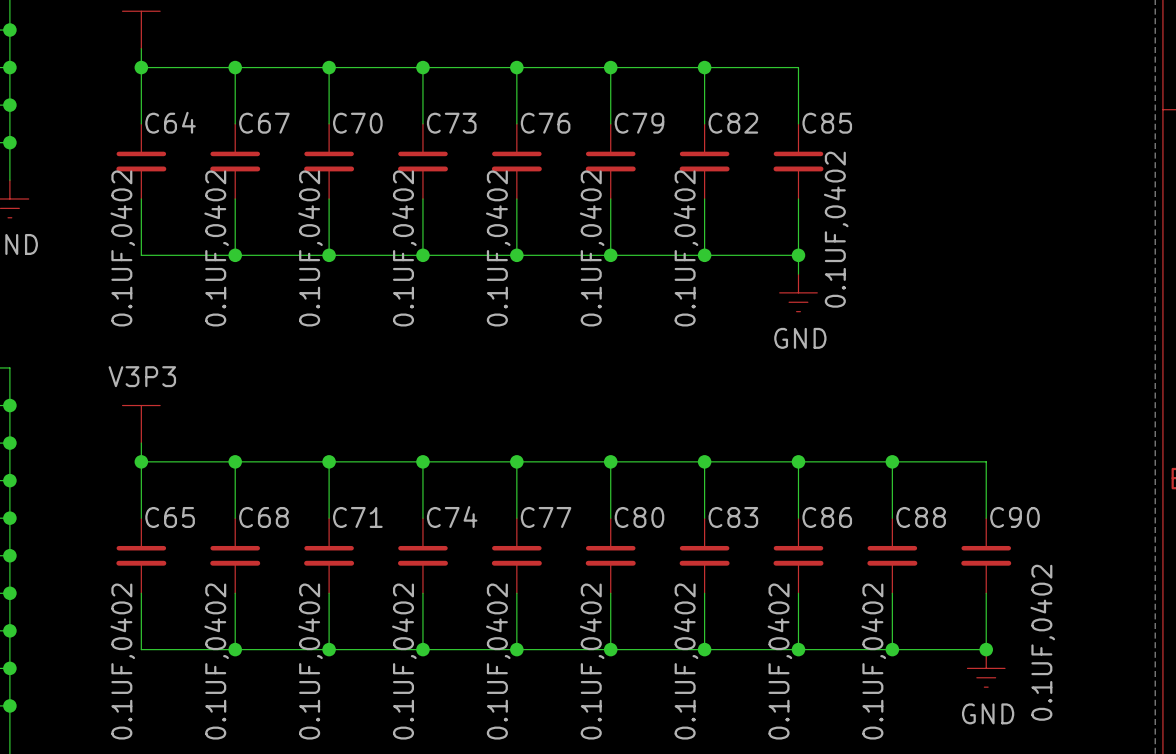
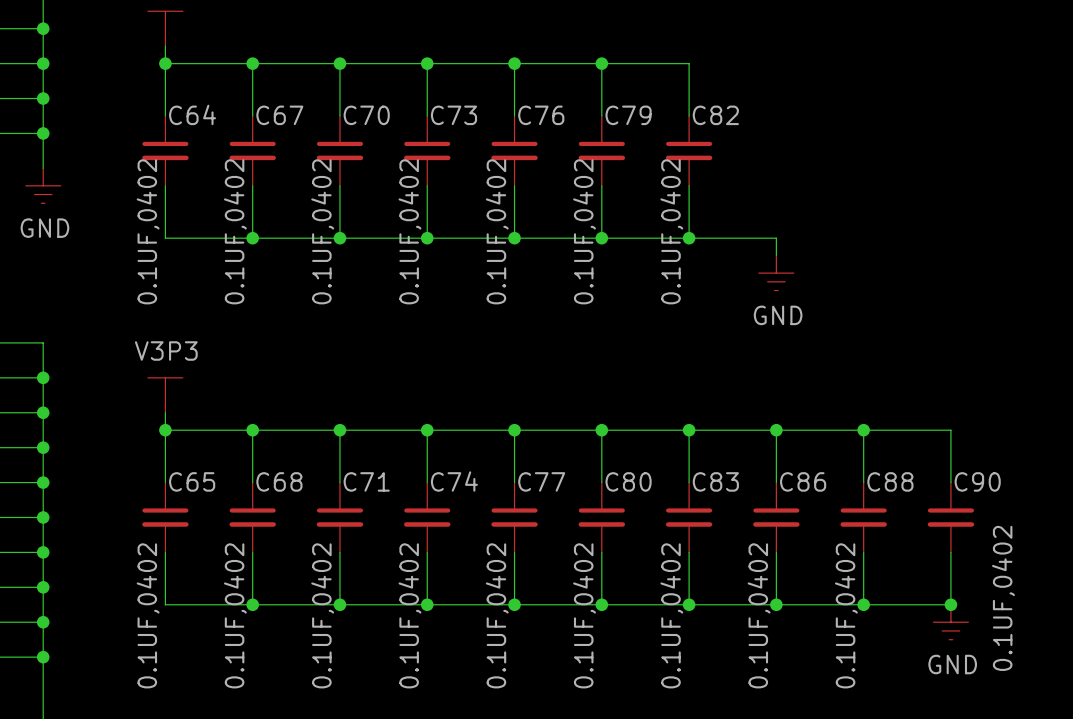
wire: (704, 67) (798, 67) (798, 123) -> none
junction: (704, 67) -> none
C85: 0.1UF,0402 (798, 161) -> none
wire: (798, 198) (798, 255) -> none
junction: (798, 255) -> none

